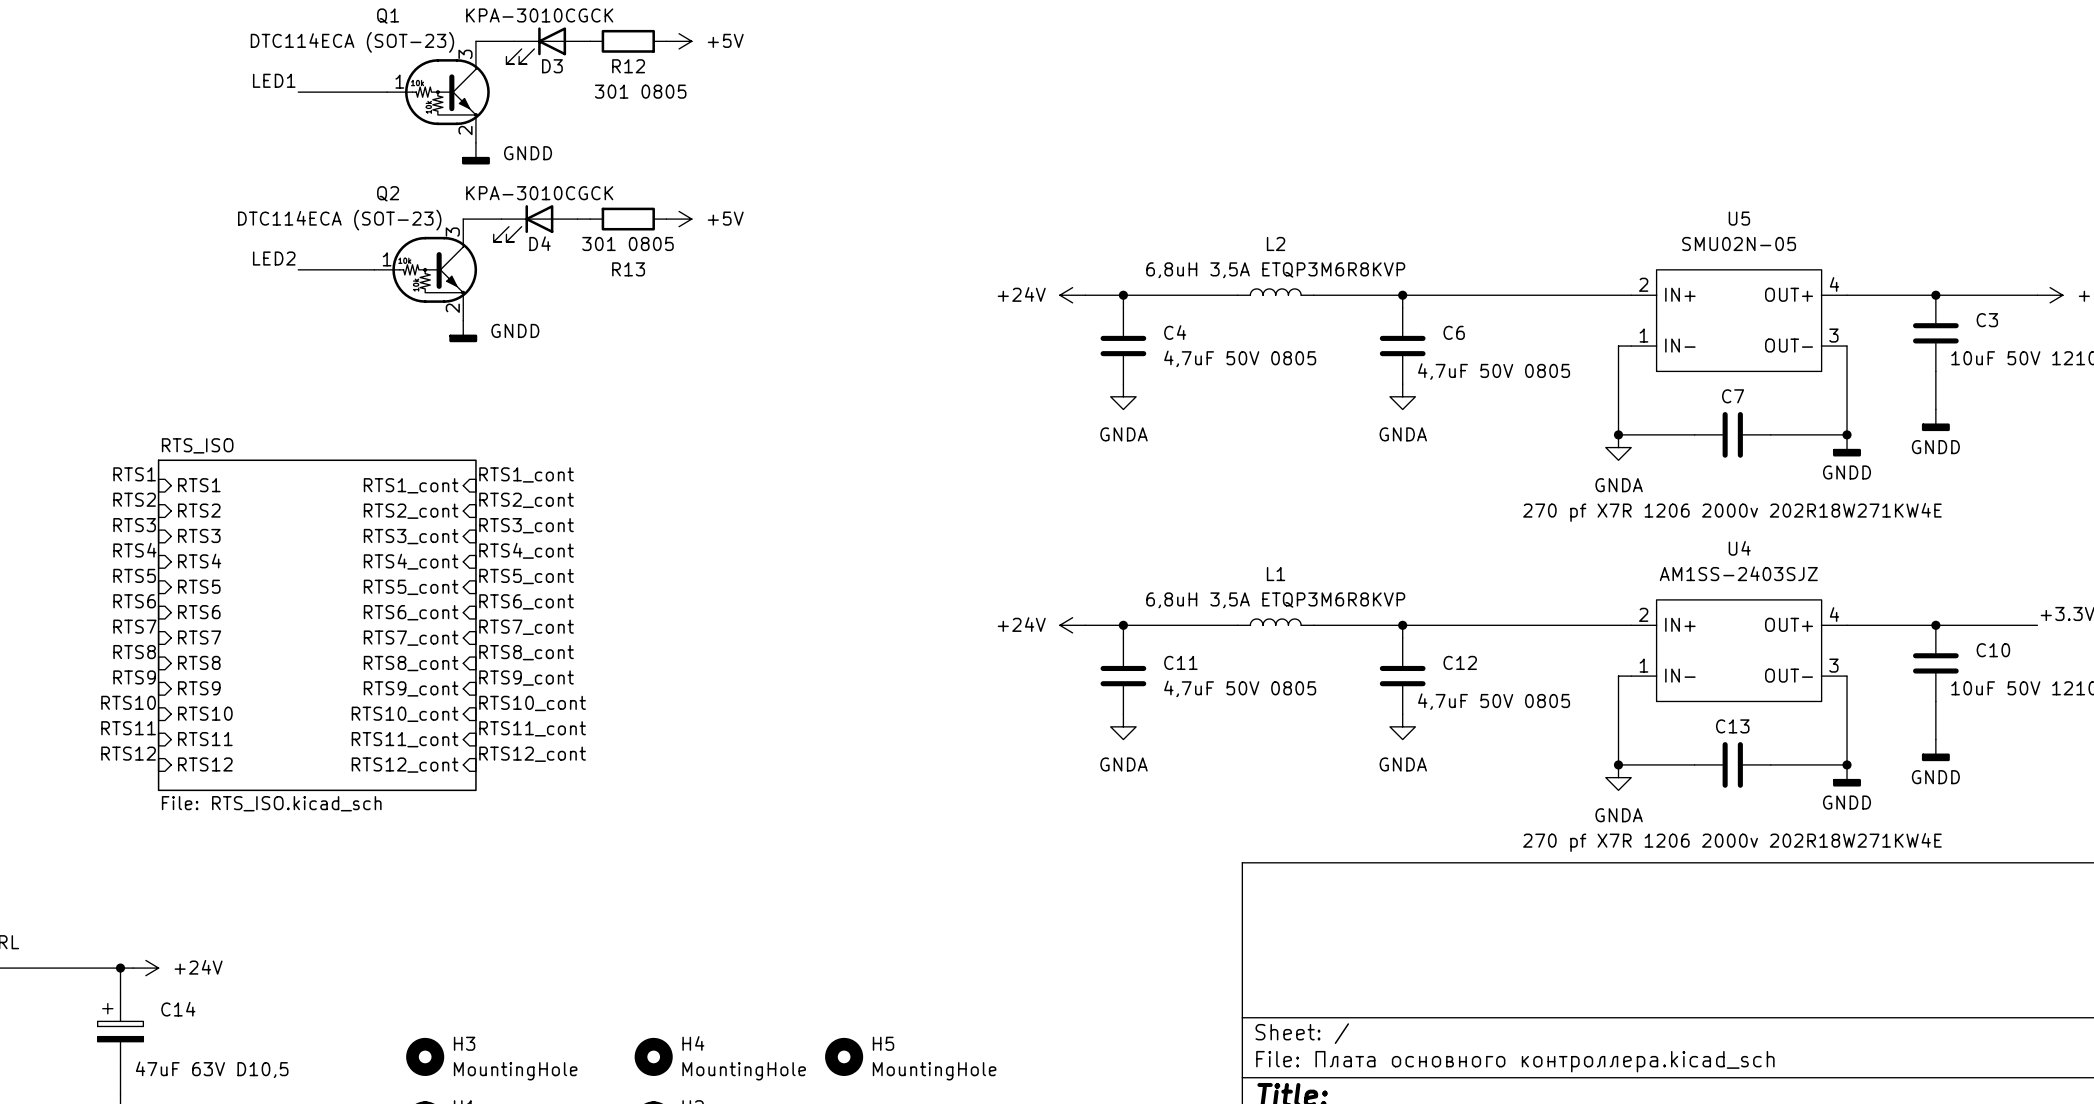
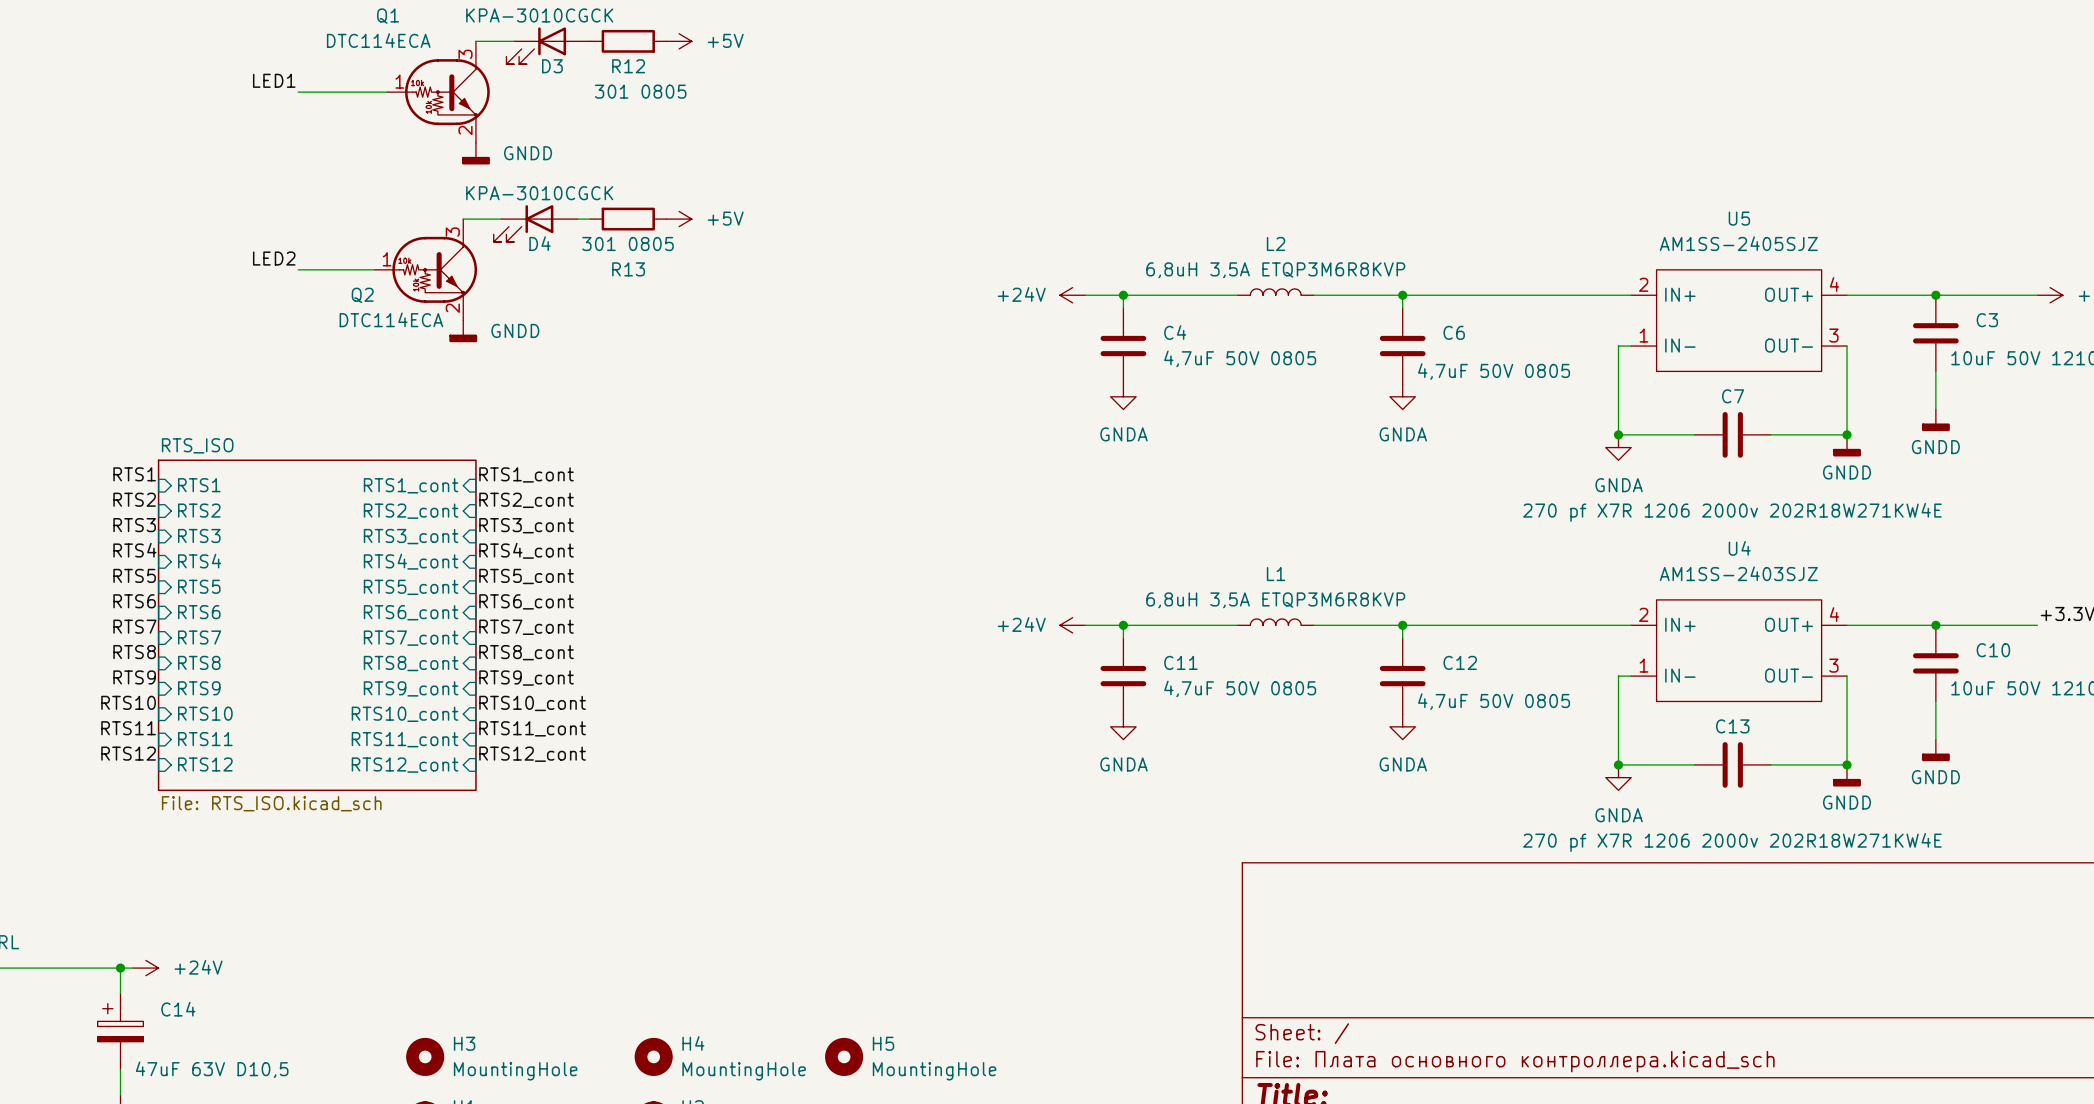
Q1 value: DTC114ECA (SOT-23) (352, 42) -> DTC114ECA (378, 40)
Q2 name position: Q2 (388, 193) -> Q2 (362, 295)
Q2 value: DTC114ECA (SOT-23) (339, 220) -> DTC114ECA (391, 319)
U5 value: SMU02N-05 (1739, 243) -> AM1SS-2405SJZ (1738, 243)

